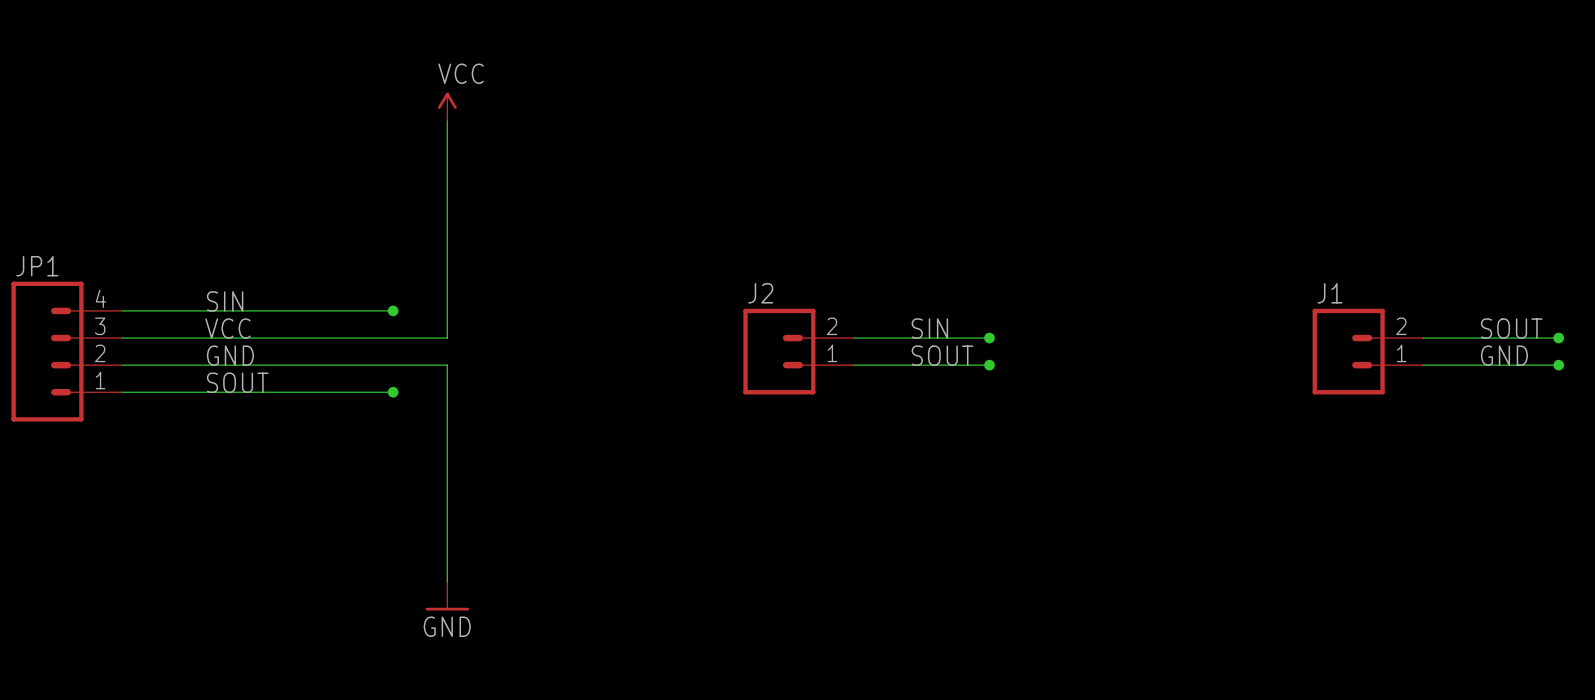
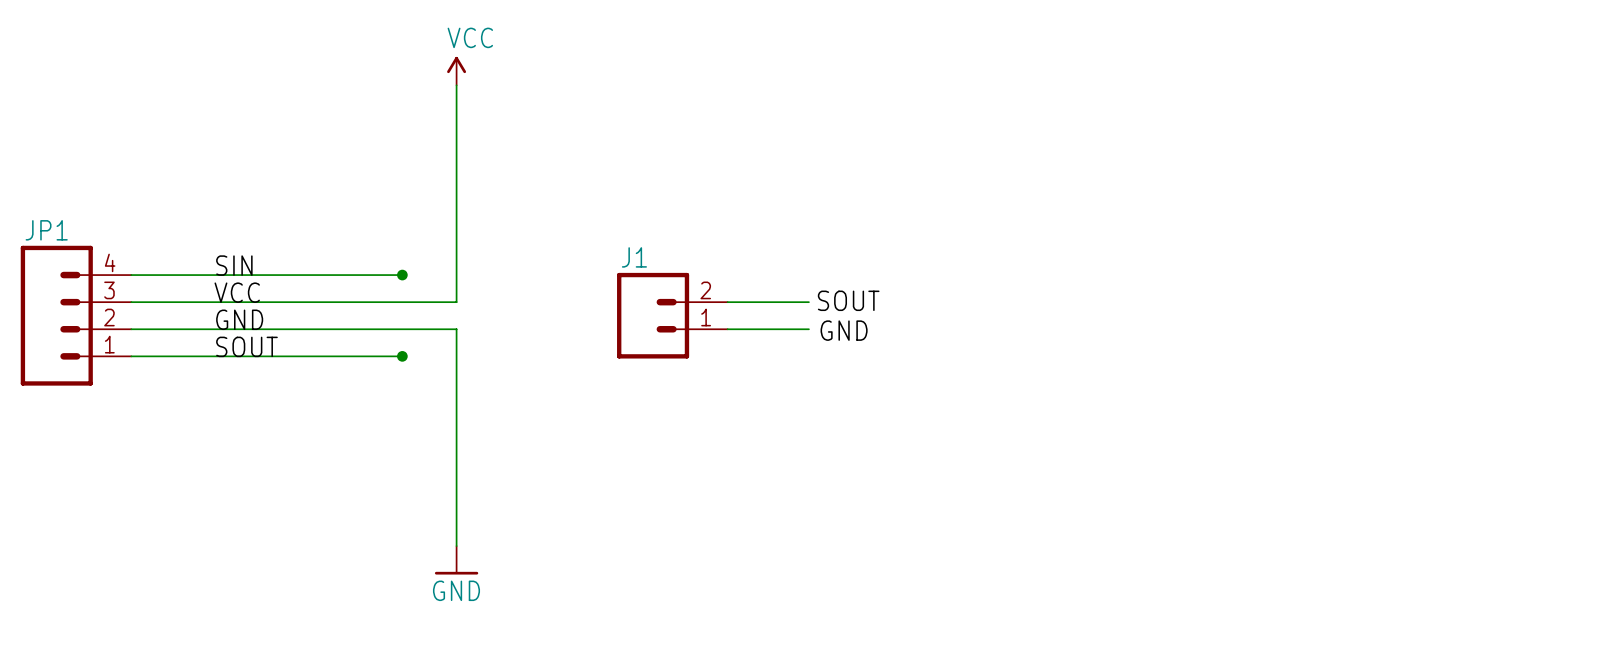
label: SIN (929, 328) -> none
label: SOUT (1511, 328) -> none
wire: none -> (727, 302) (808, 302)
wire: (853, 338) (989, 338) -> none
junction: (989, 338) -> none
wire: (1423, 338) (1558, 338) -> none
junction: (1558, 338) -> none
J2: (798, 351) -> none
J1 position: (1367, 351) -> (672, 315)
label position: SOUT (942, 355) -> SOUT (848, 300)
label: GND (1504, 355) -> none
wire: none -> (727, 329) (808, 329)
wire: (853, 365) (989, 365) -> none
junction: (989, 365) -> none
wire: (1423, 365) (1558, 365) -> none
junction: (1558, 365) -> none
label: none -> GND (844, 330)

